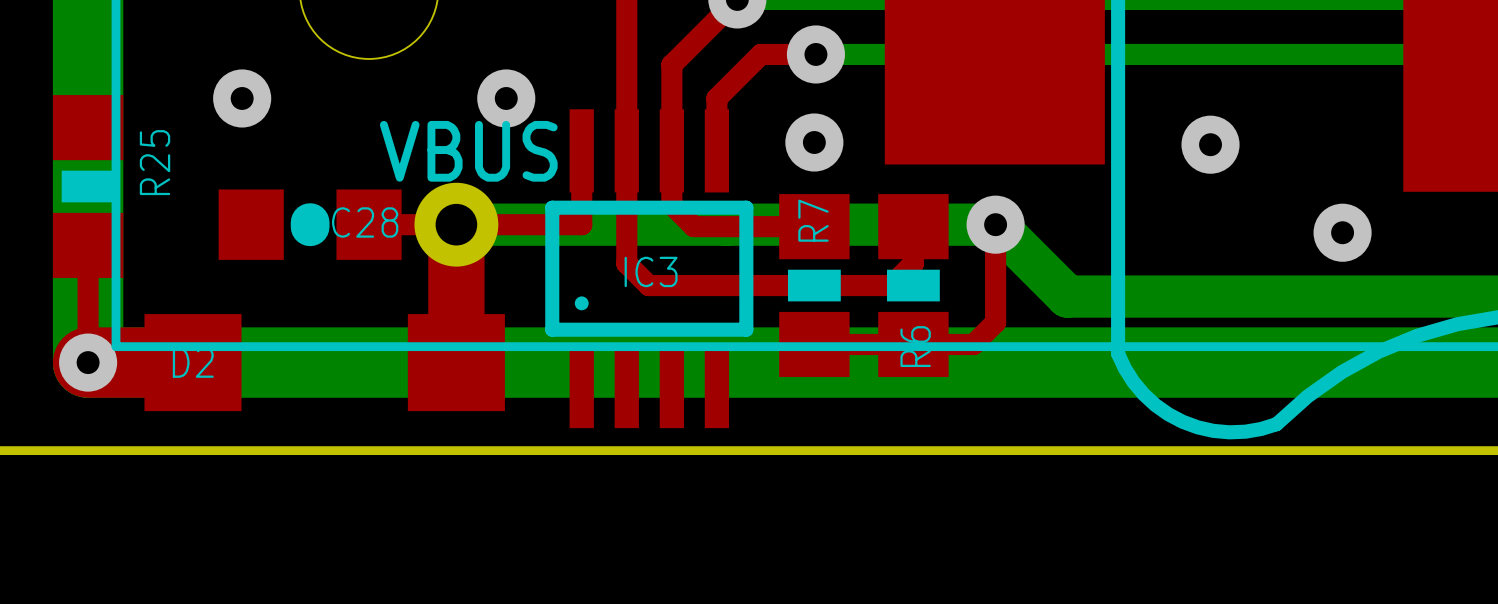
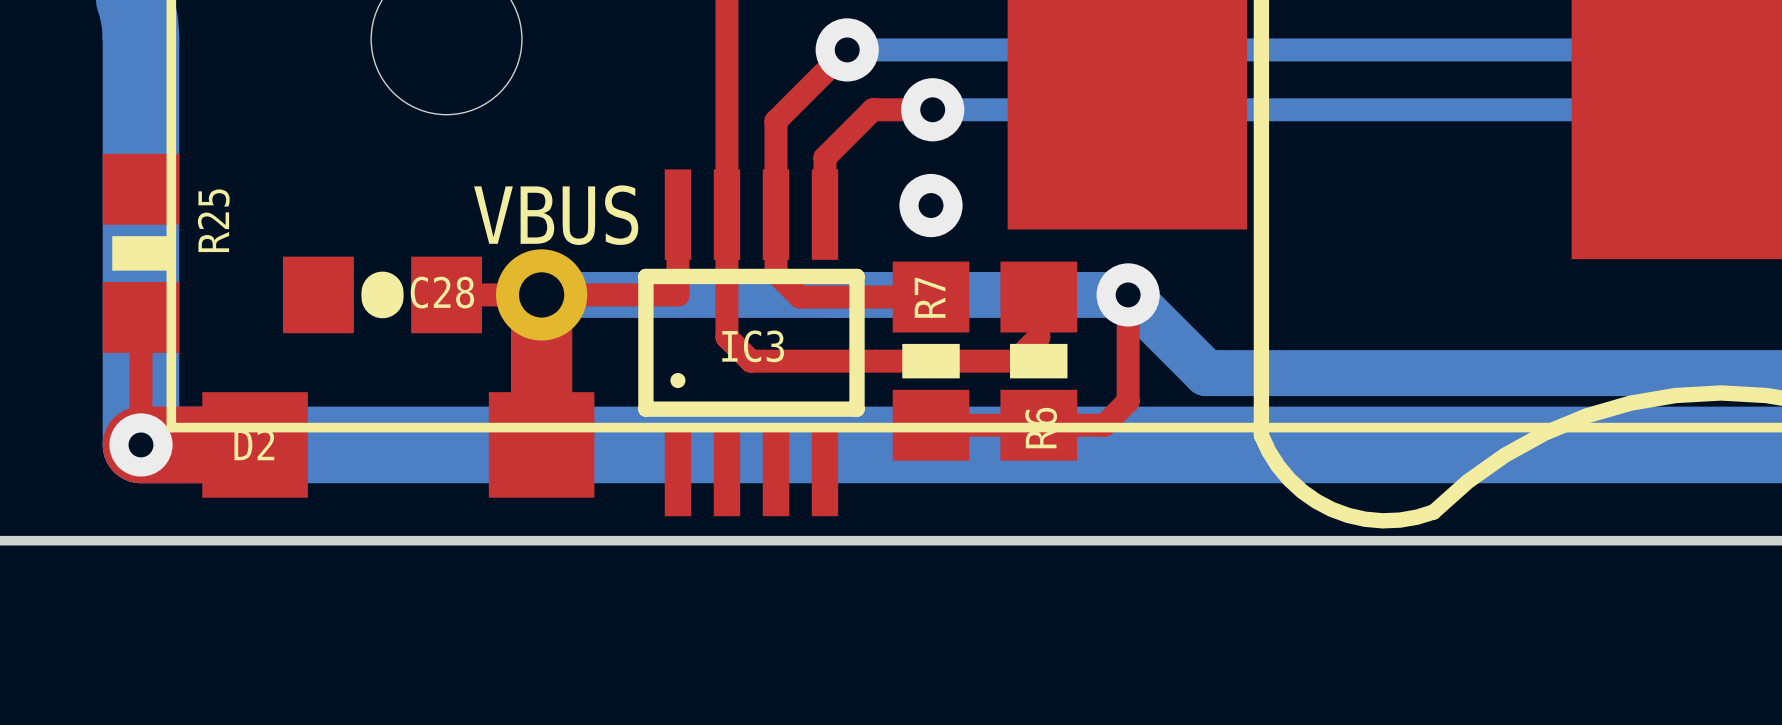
via: (242, 98) -> none
via: (506, 98) -> none
via: (1210, 144) -> none
via: (1342, 232) -> none

